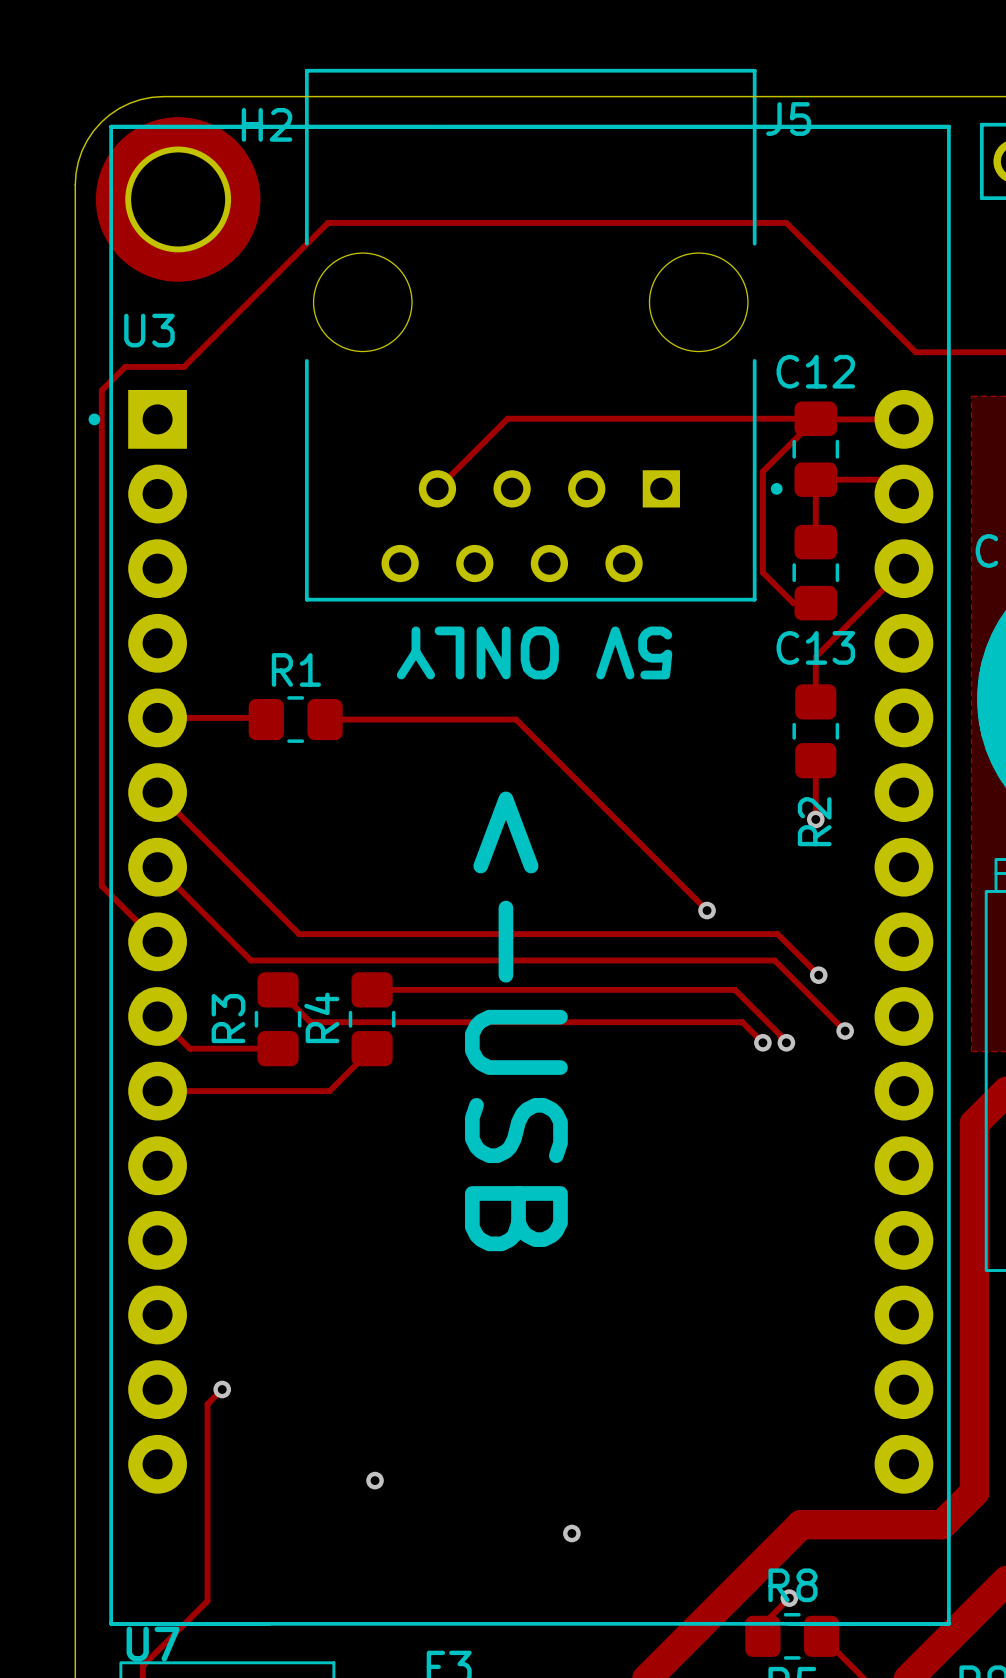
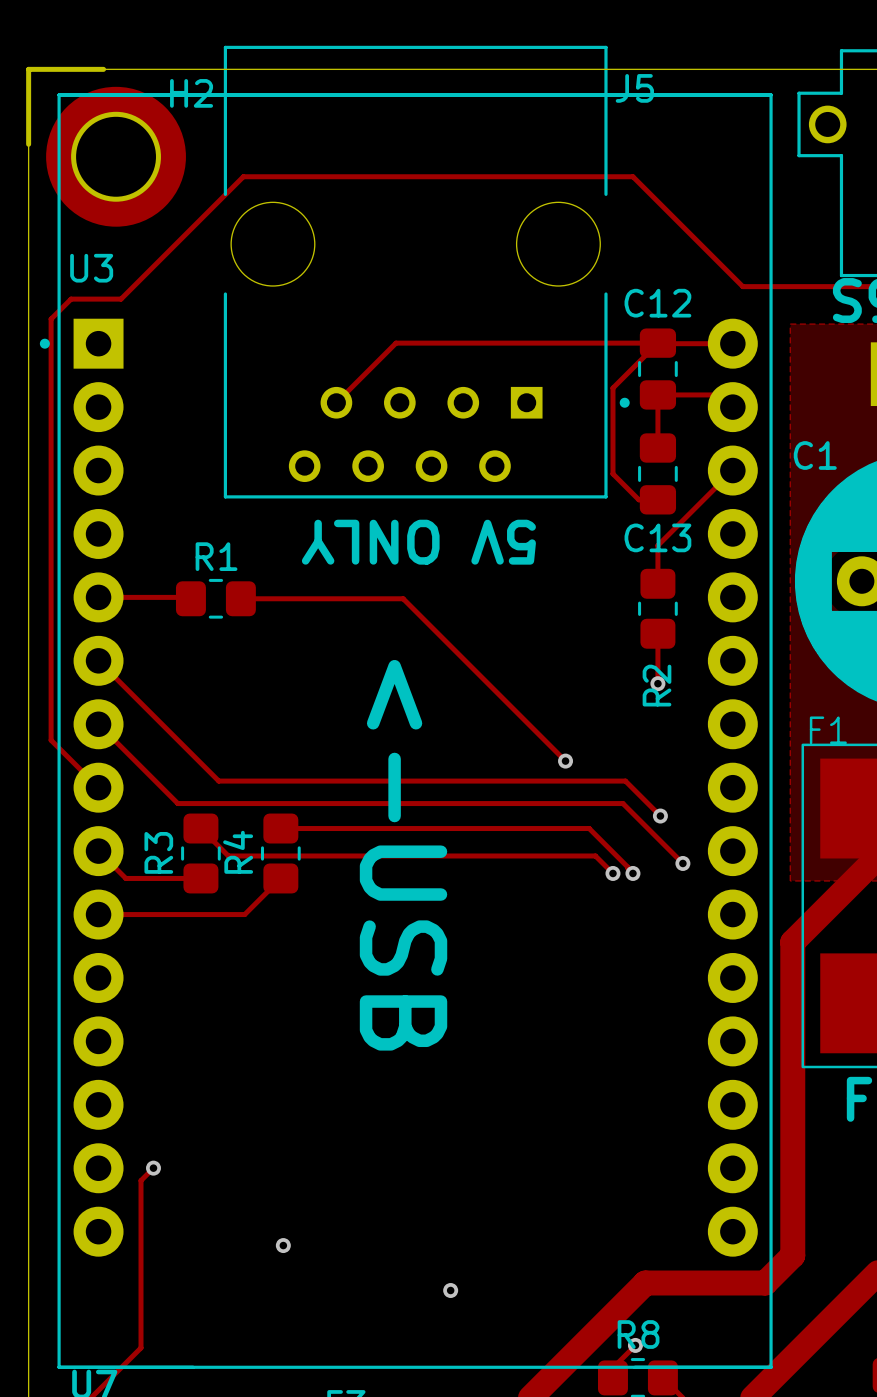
board edge: (163, 96) (140, 99) (129, 103) (119, 108) (101, 122) (93, 131) (82, 151) (76, 173) (75, 184) -> (103, 69) (28, 69) (28, 144)

